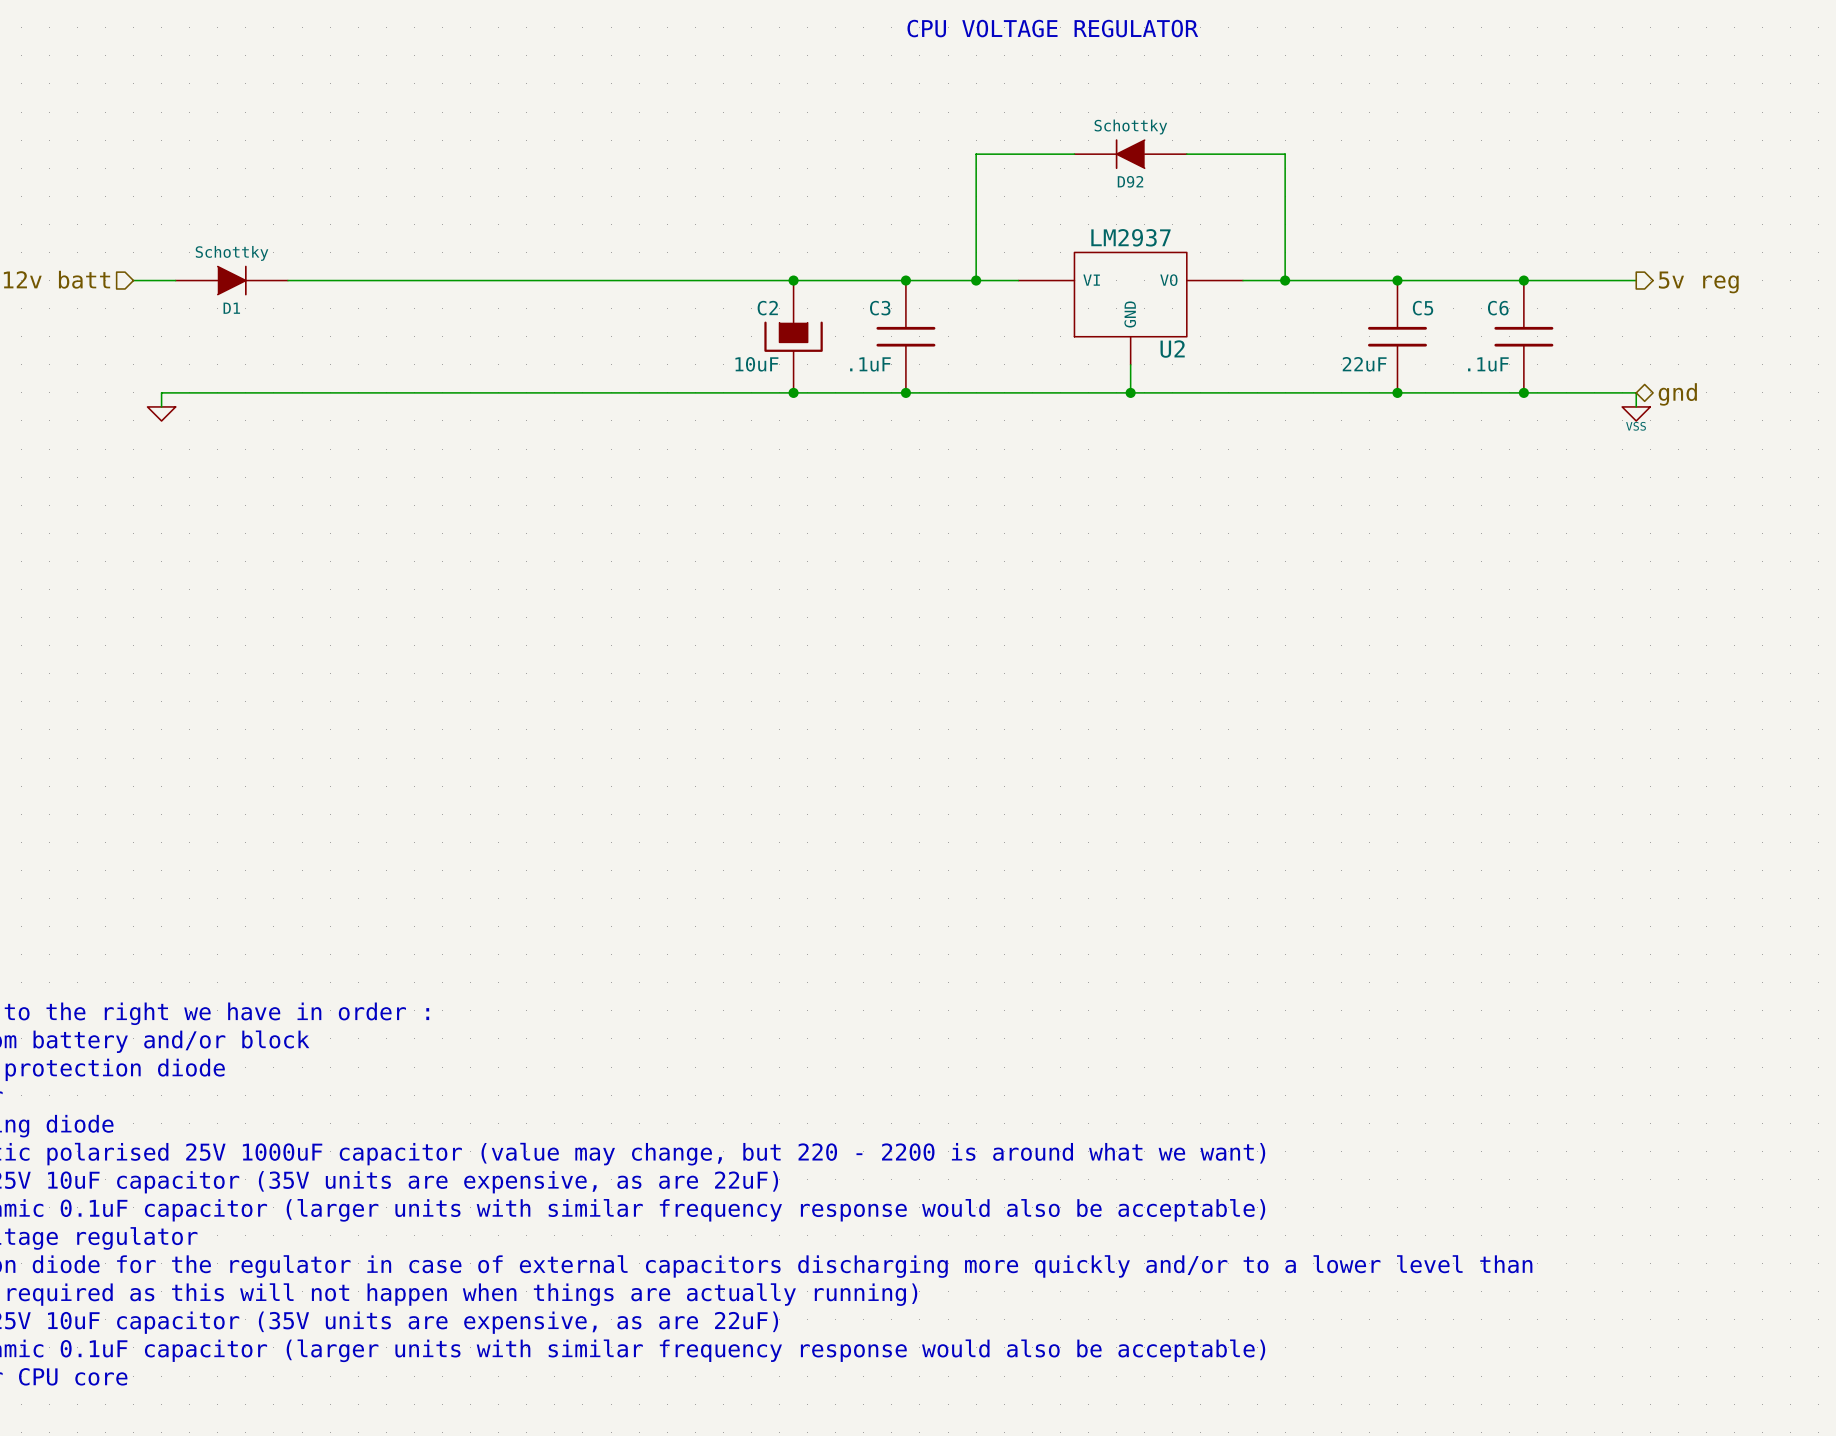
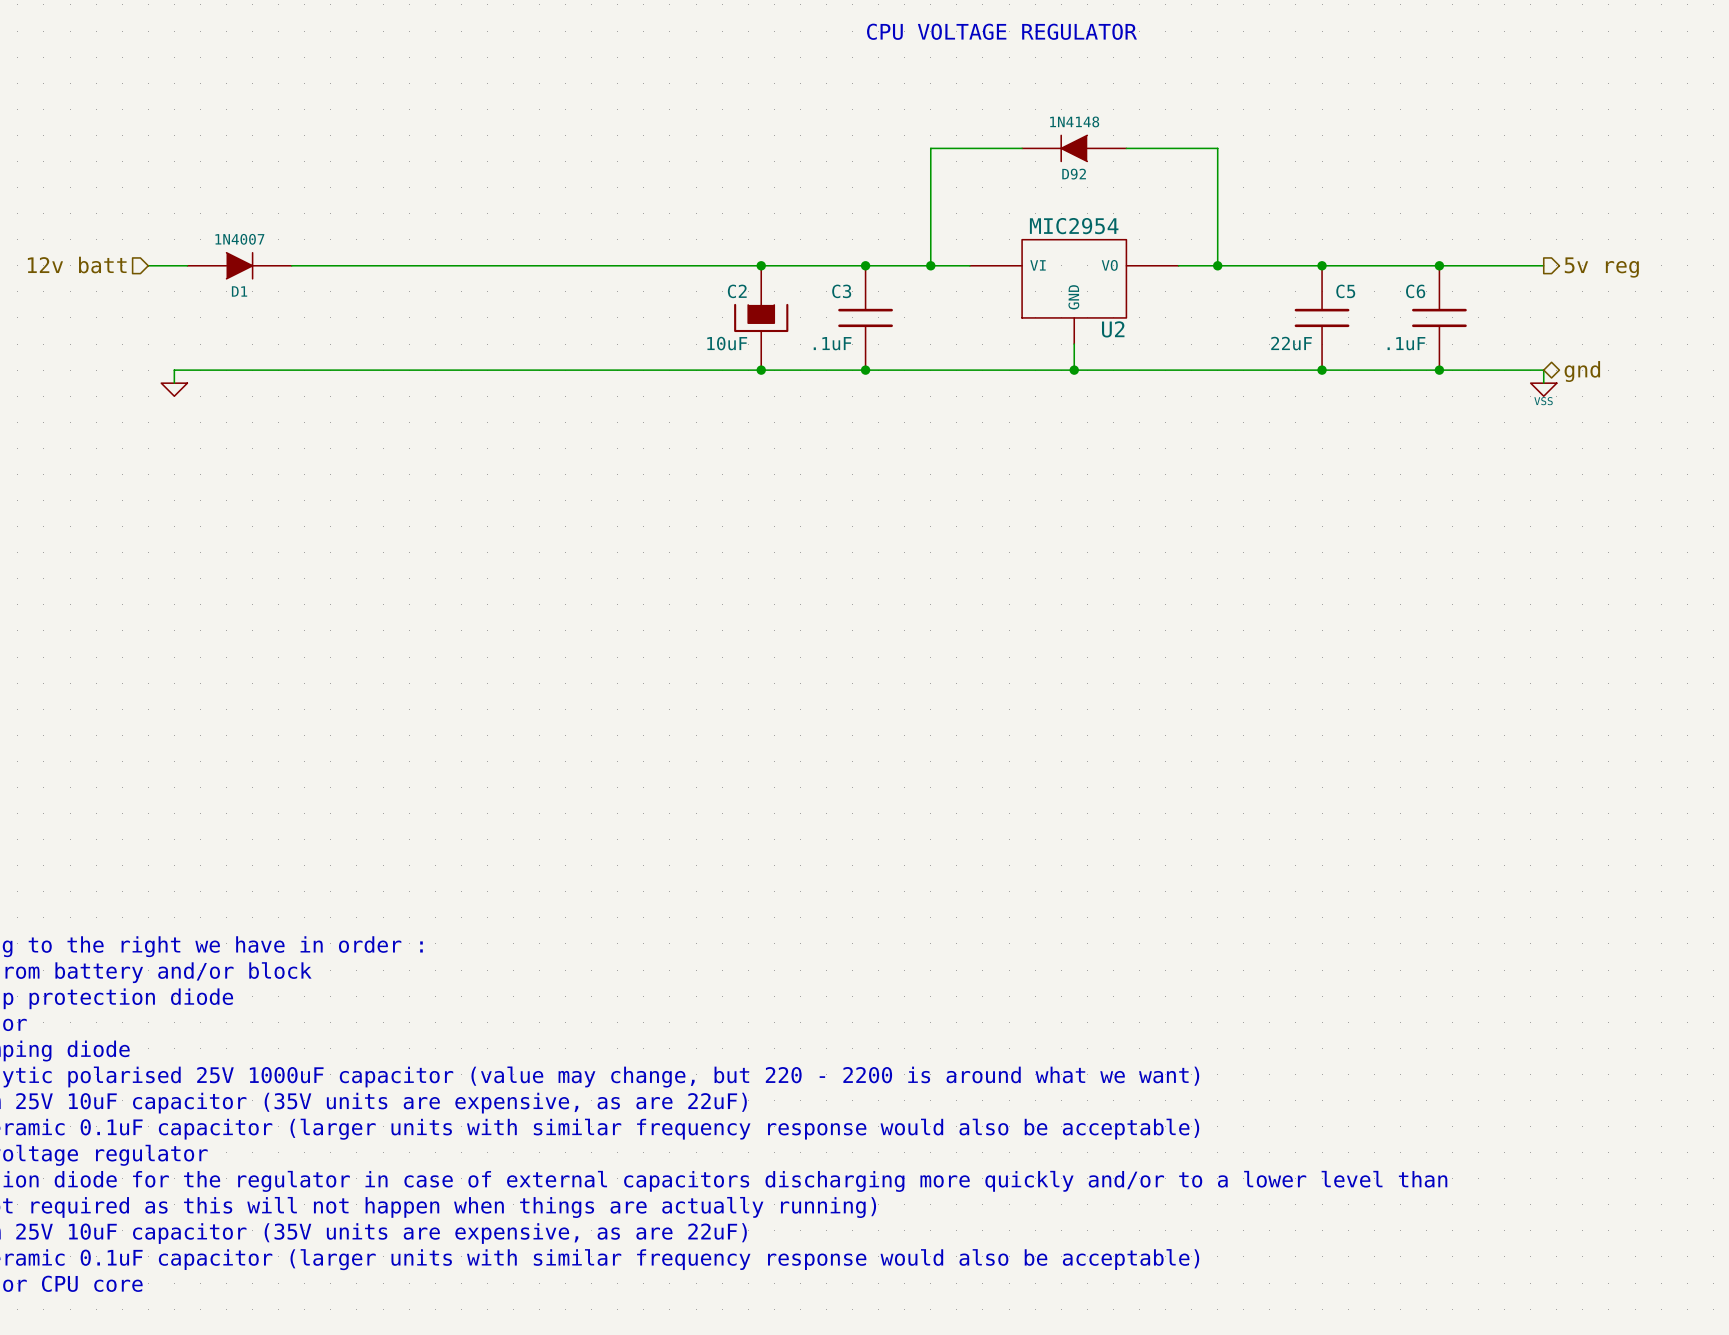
D92 value: Schottky (1130, 127) -> 1N4148 (1074, 121)
U2 value: LM2937 (1130, 237) -> MIC2954 (1074, 226)
D1 value: Schottky (232, 253) -> 1N4007 (239, 239)

